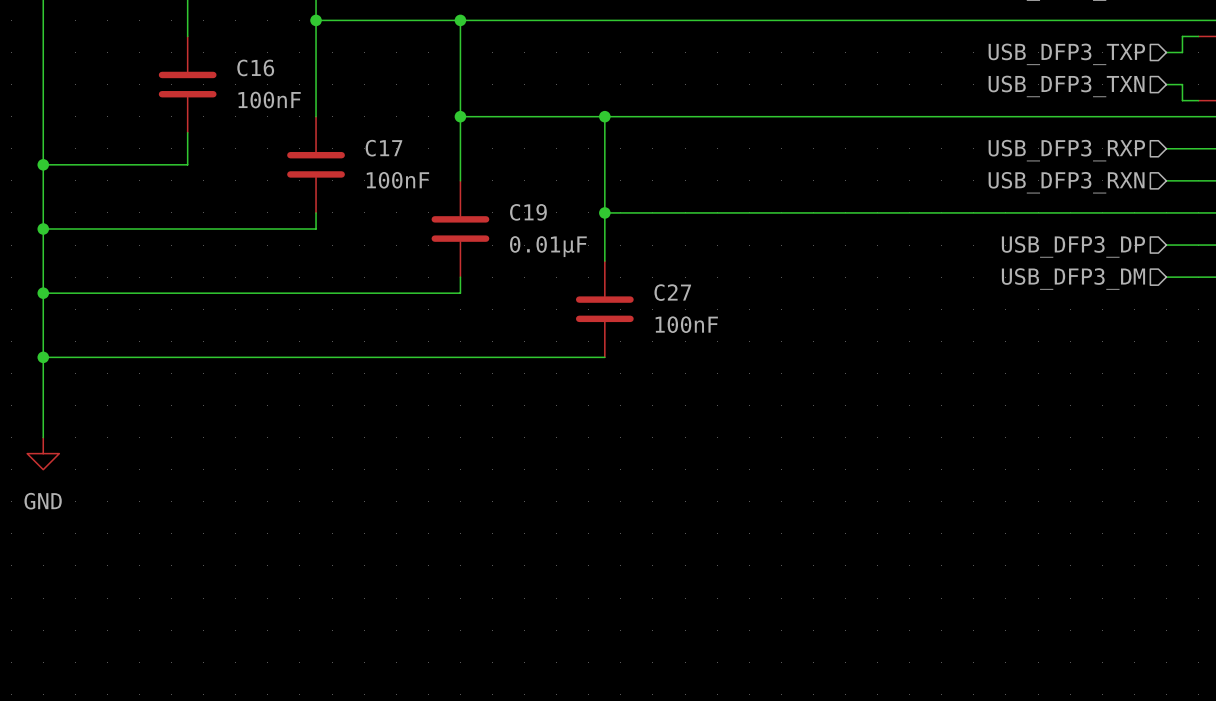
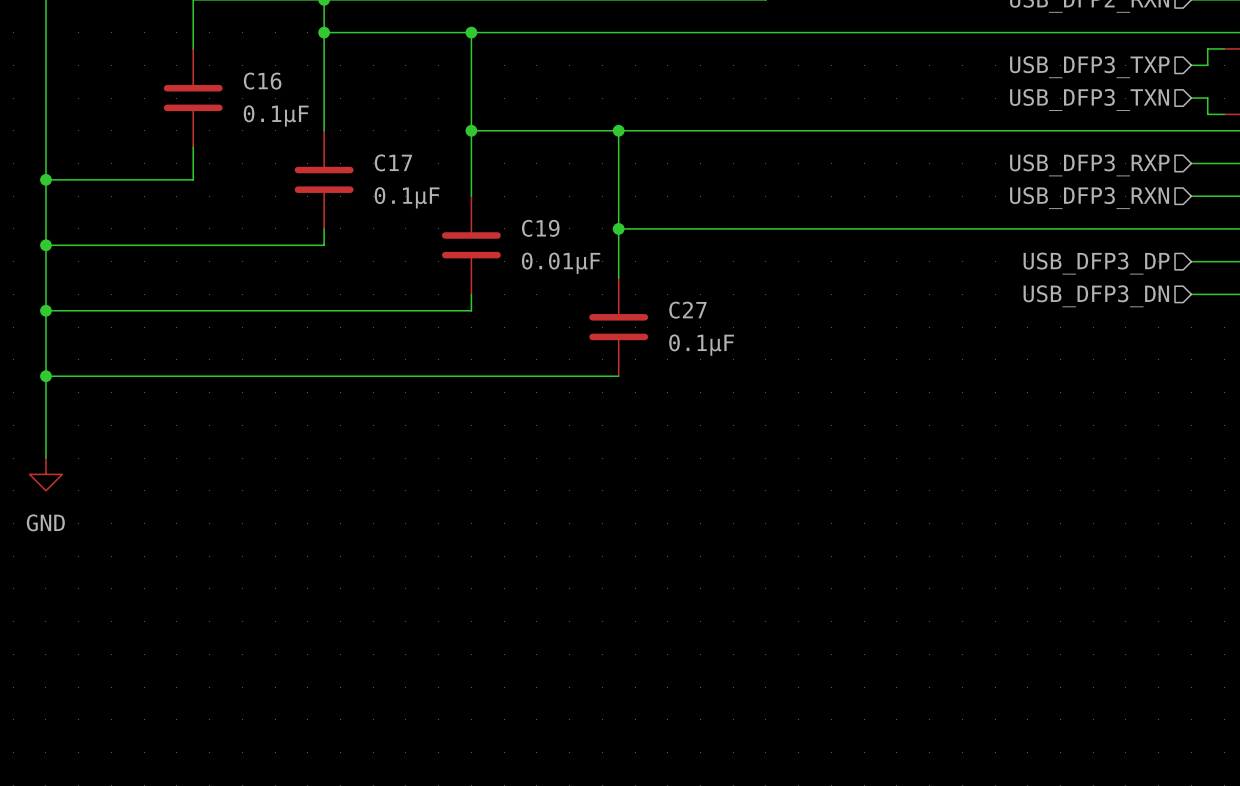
C16 value: 100nF (269, 100) -> 0.1µF (276, 115)
C17 value: 100nF (397, 180) -> 0.1µF (407, 197)
hierarchical label: USB_DFP3_DM (1073, 278) -> USB_DFP3_DN (1096, 296)
C27 value: 100nF (686, 324) -> 0.1µF (701, 345)

